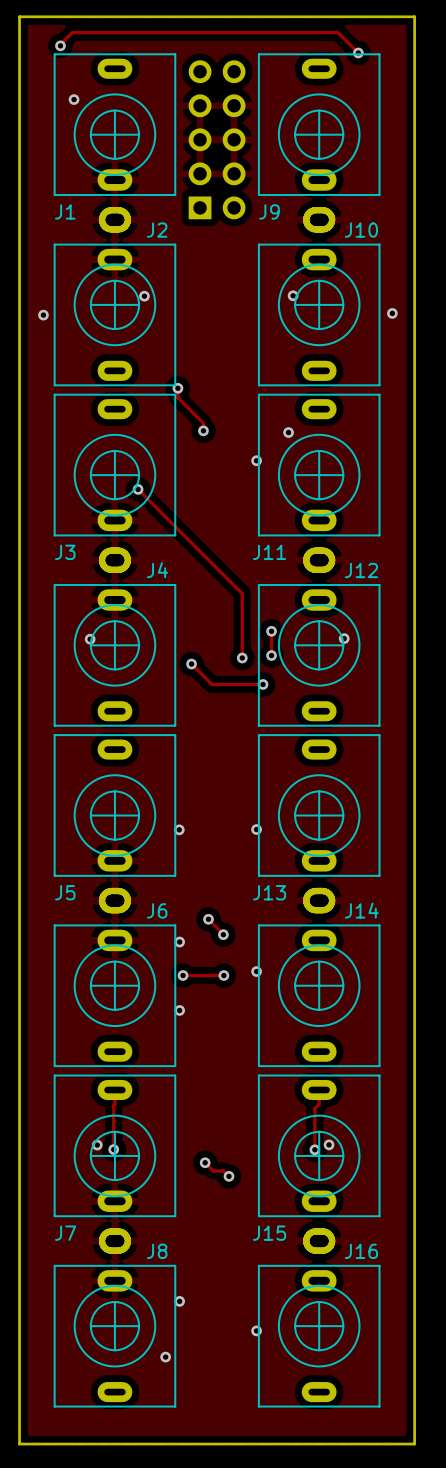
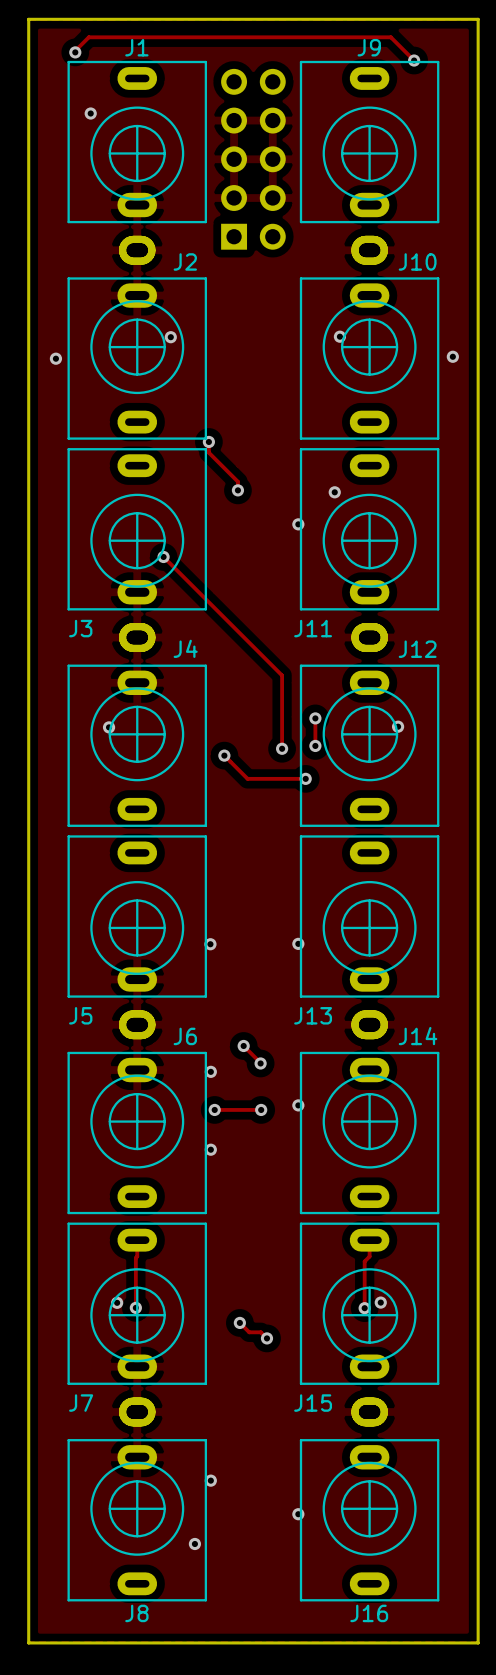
J1 name position: J1 (65, 211) -> J1 (136, 47)
J9 name position: J9 (269, 211) -> J9 (369, 47)
J8 name position: J8 (157, 1251) -> J8 (136, 1613)
J16 name position: J16 (361, 1251) -> J16 (369, 1613)

